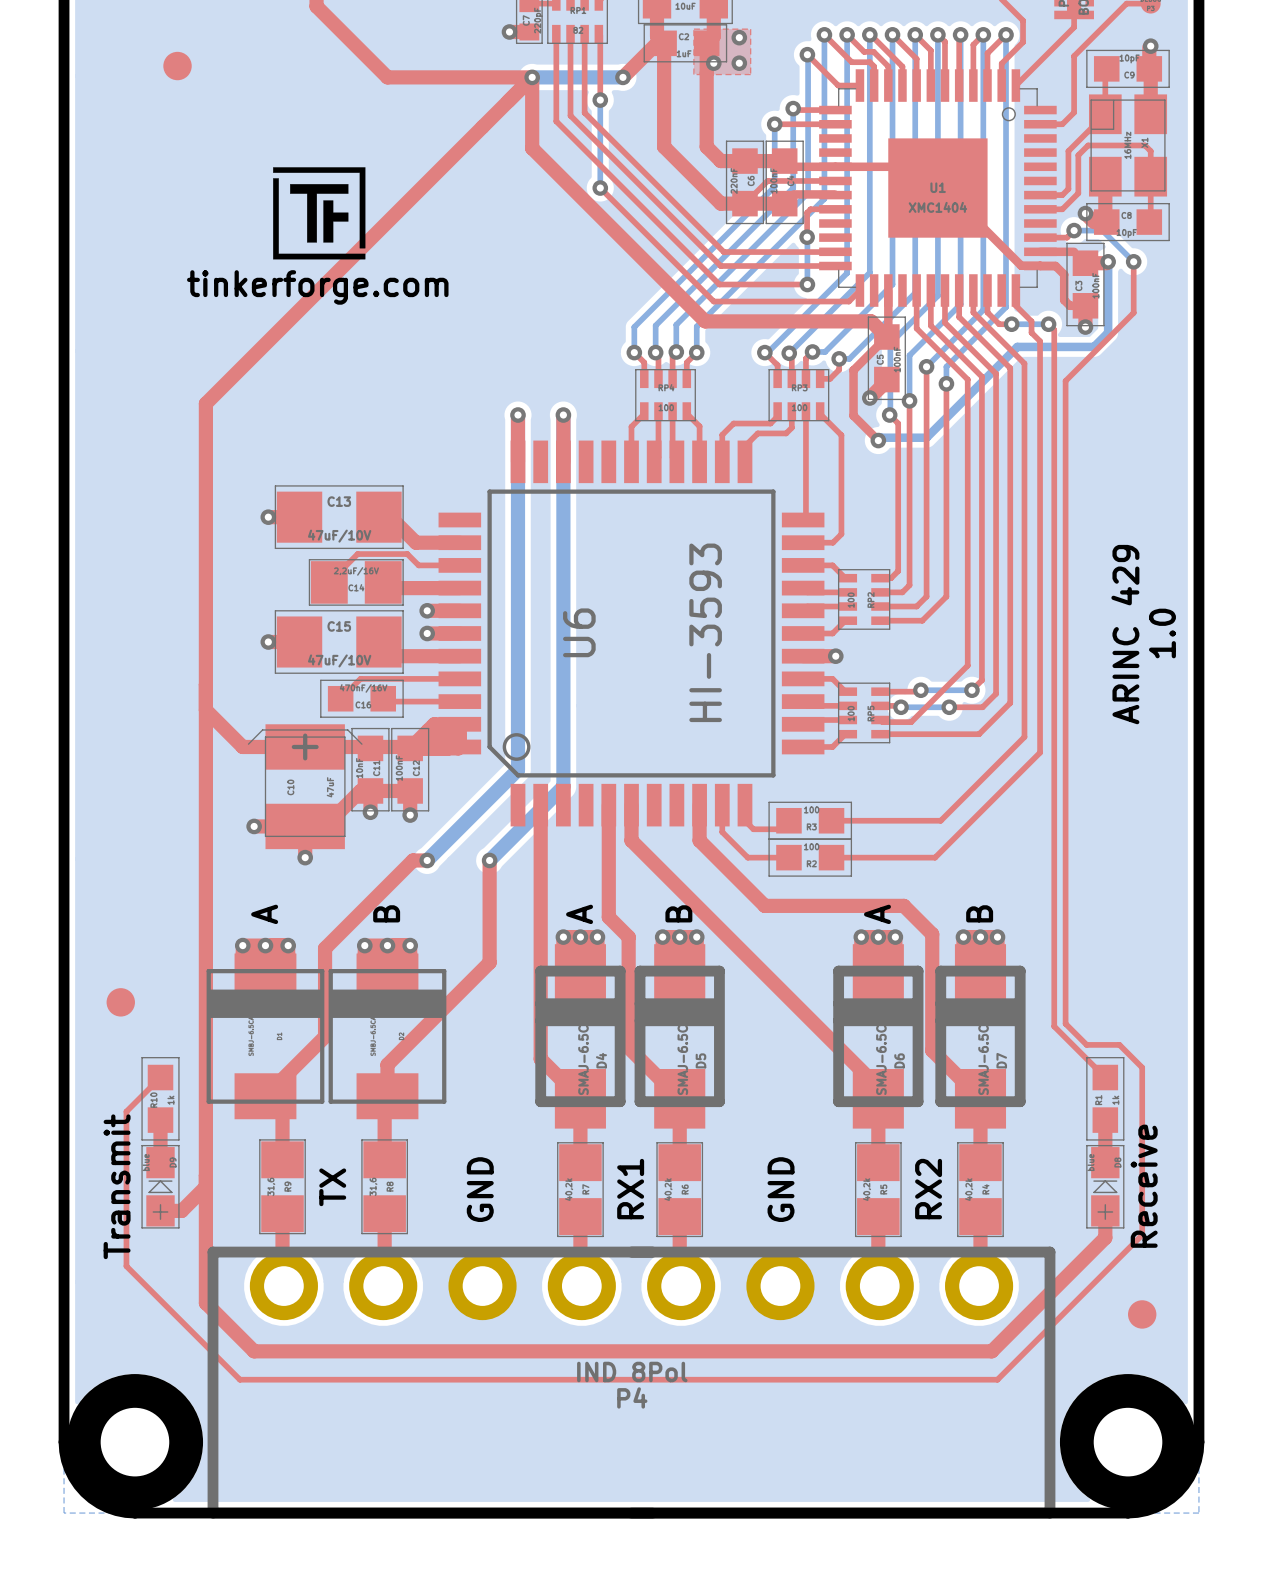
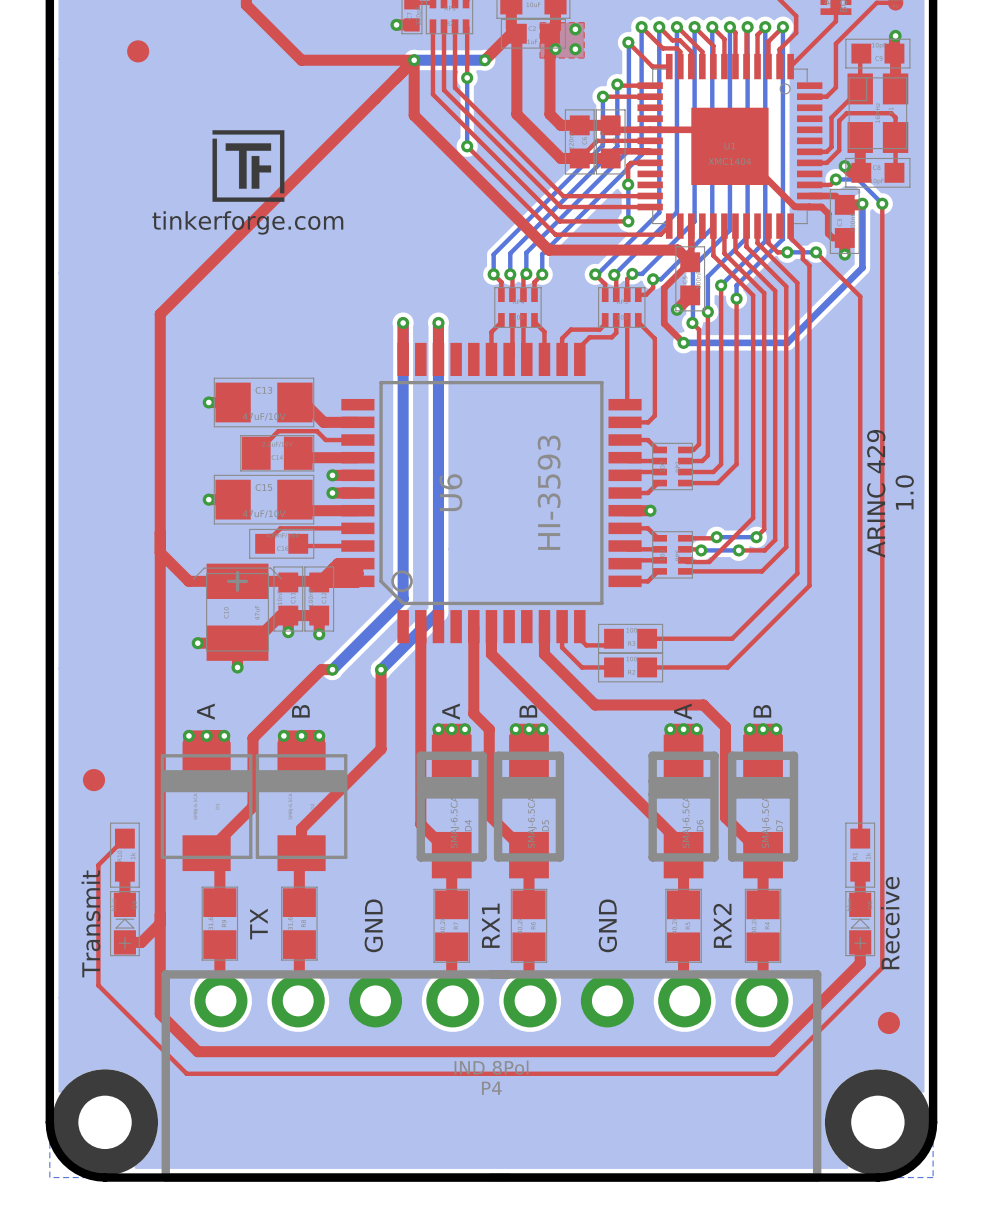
top track: (1133, 312) (1065, 380) (1065, 1023) (1086, 1044) (1119, 1044) (1142, 1067) (1142, 1235) (1133, 1243) -> (882, 243) (882, 967)
top track: (1054, 329) (1054, 1026) (1105, 1077) -> (820, 256) (860, 296) (860, 838)
bottom track: (1108, 332) (1093, 346) (1017, 346) (926, 437) (881, 437) (878, 440) -> (862, 258) (862, 267) (787, 342) (683, 342)

